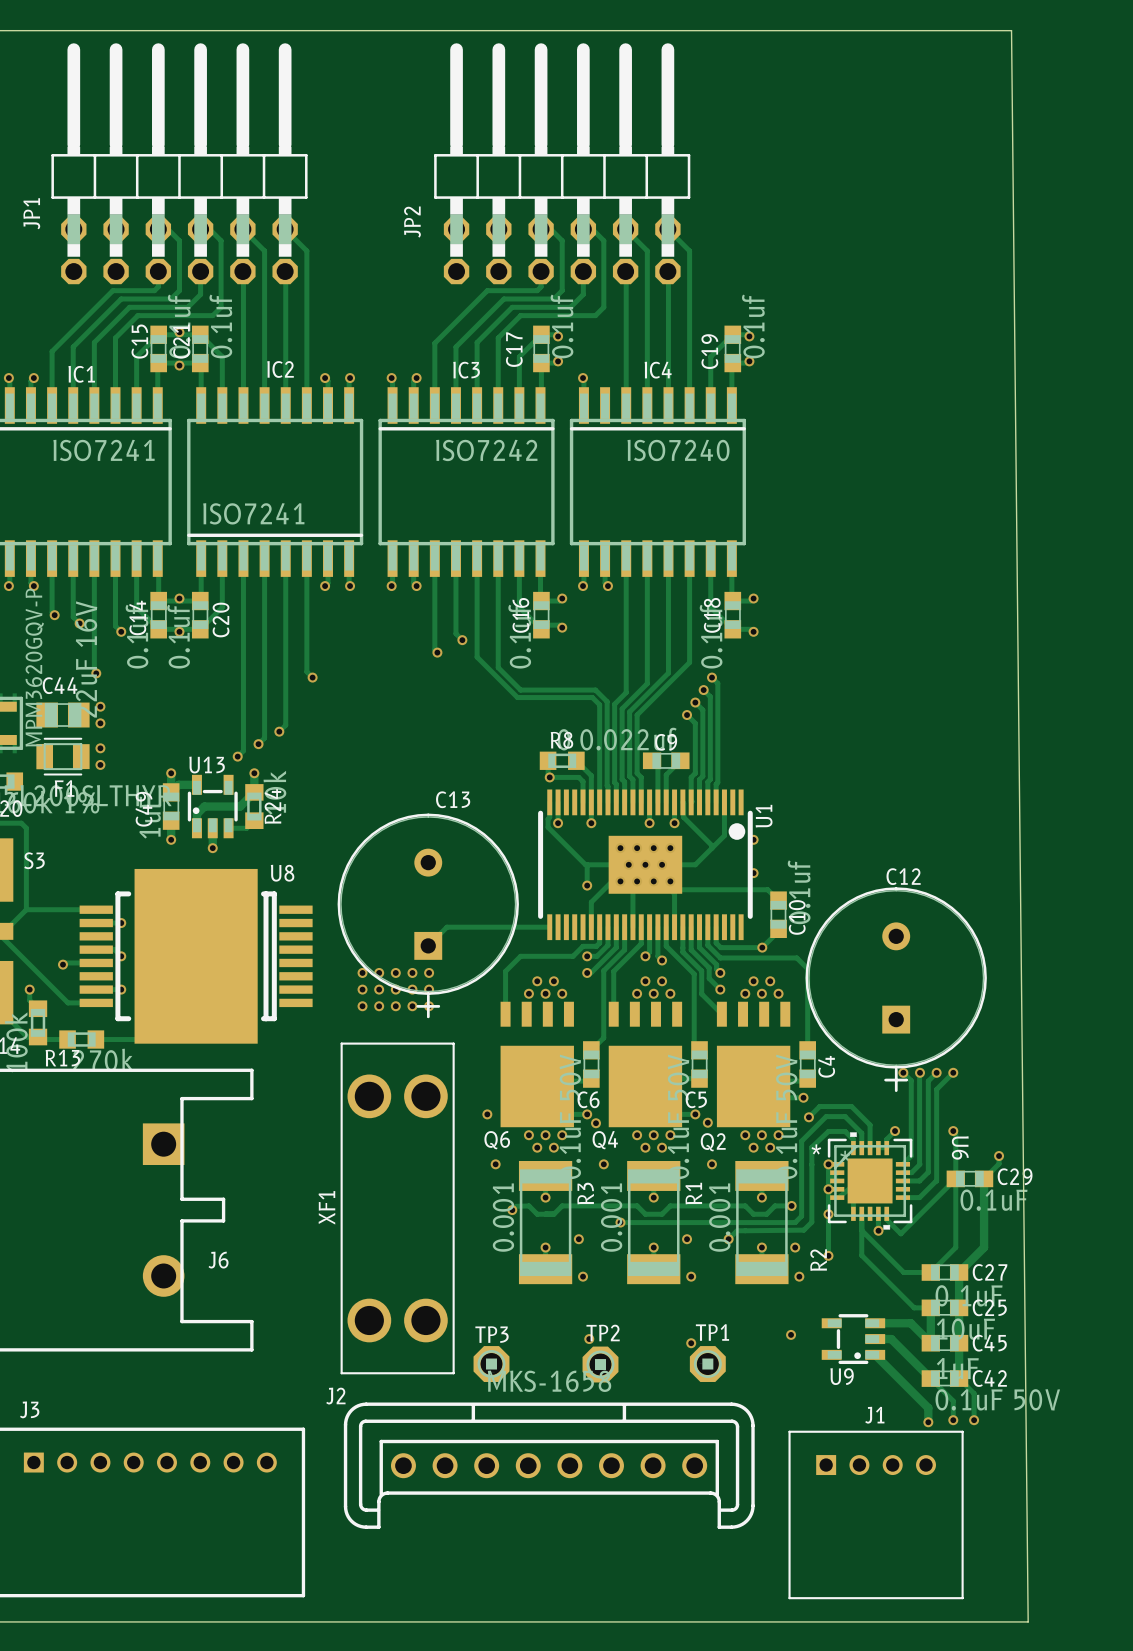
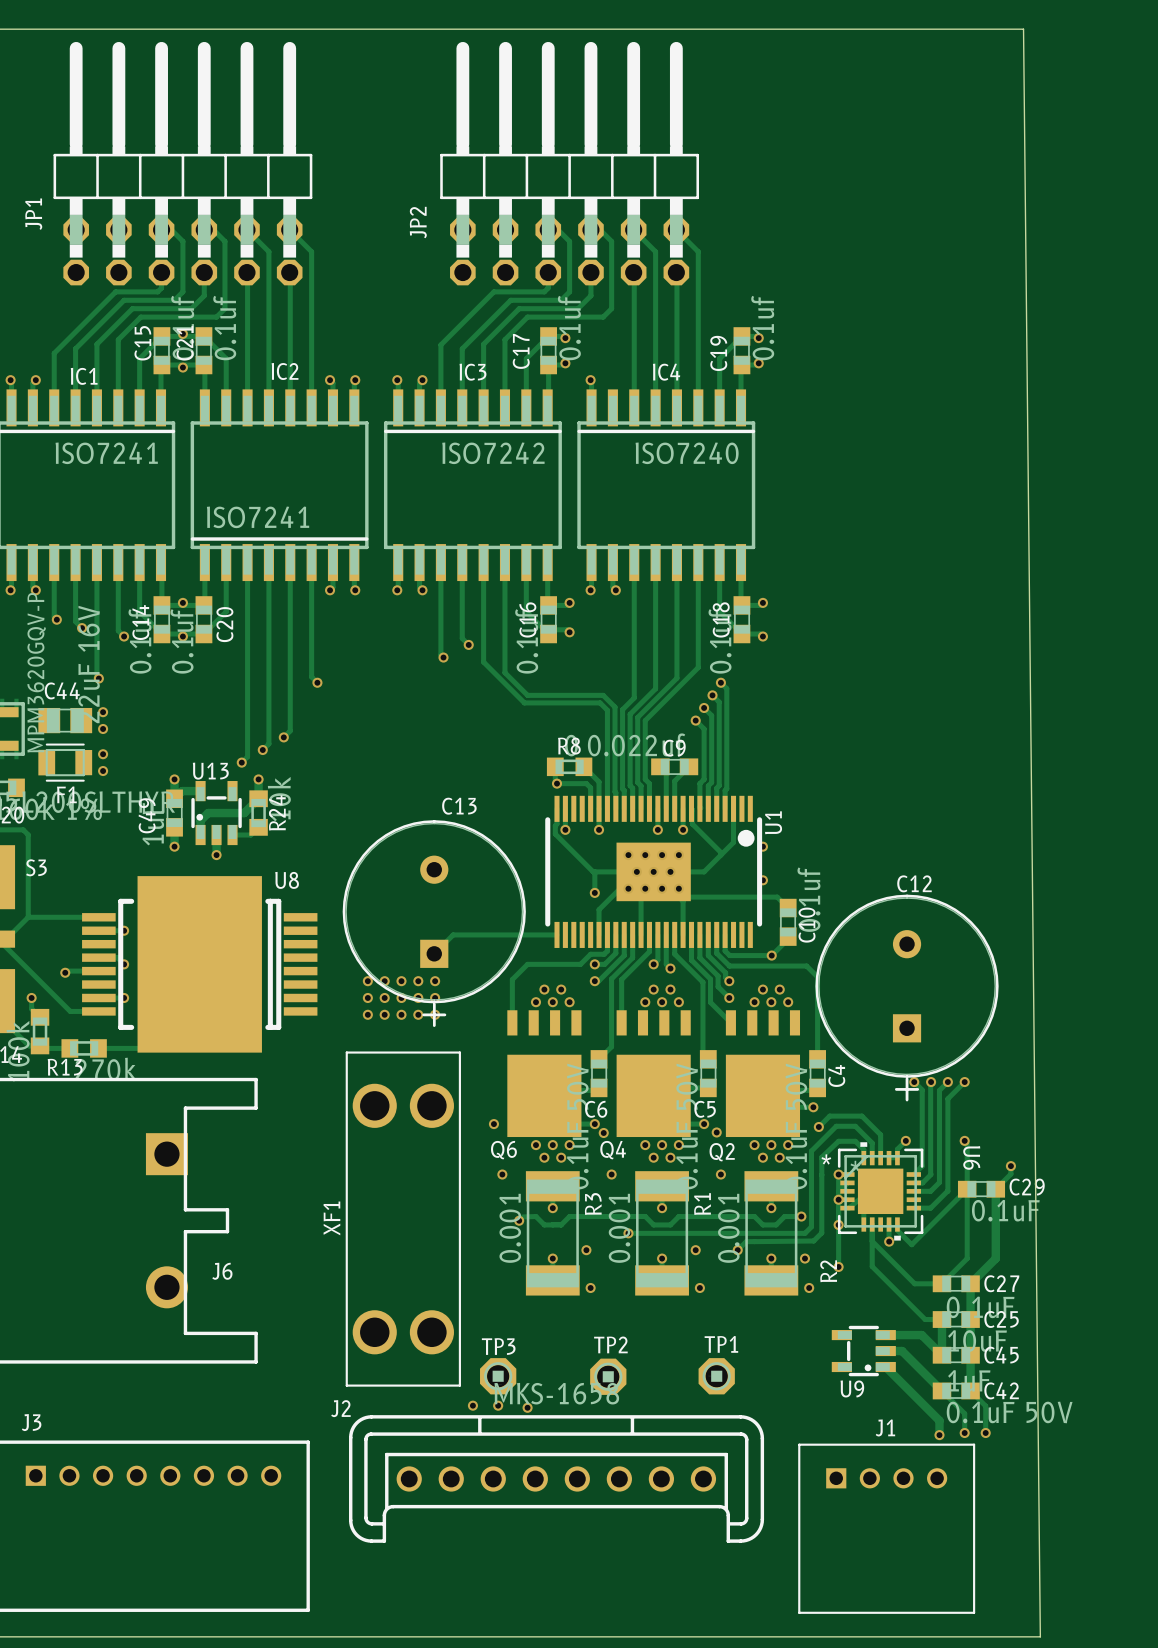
via: (791, 1334) -> none
via: (589, 1339) -> none
via: (691, 1343) -> none
via: none -> (472, 1405)
via: none -> (498, 1405)
via: none -> (527, 1407)

